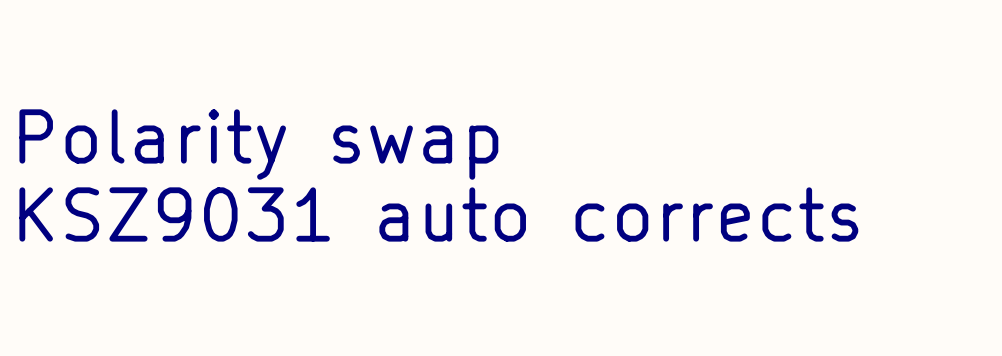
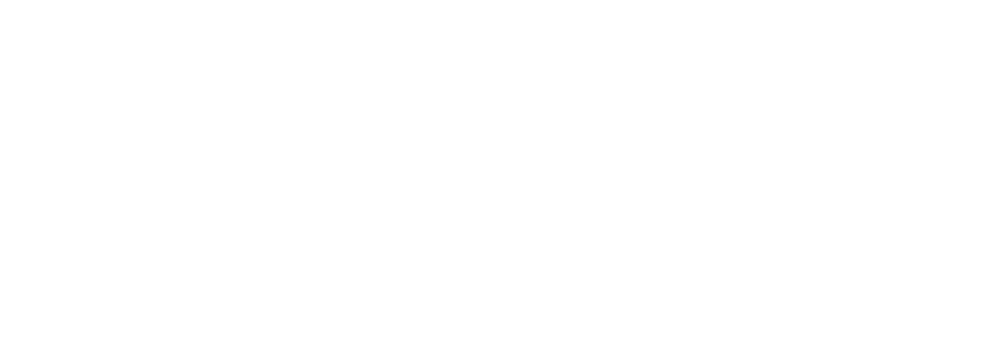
text: Polarity swap (258, 144) -> none
text: KSZ9031 auto corrects (438, 214) -> none

